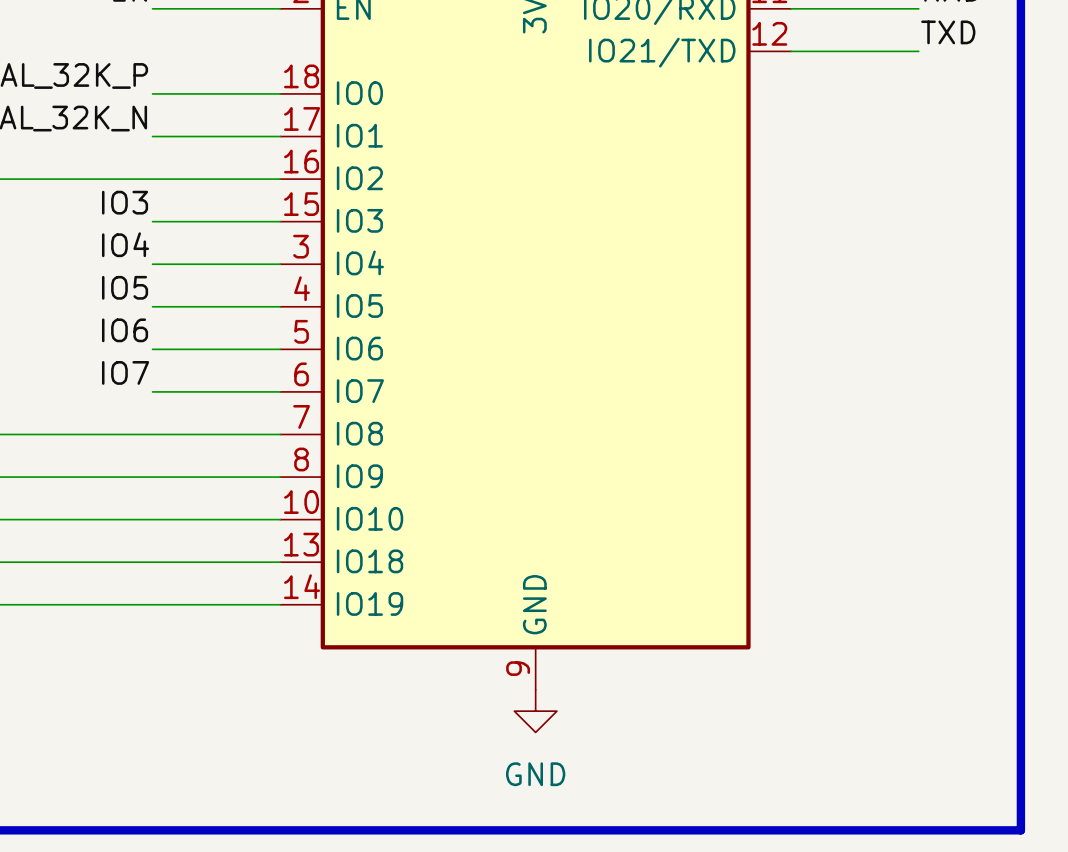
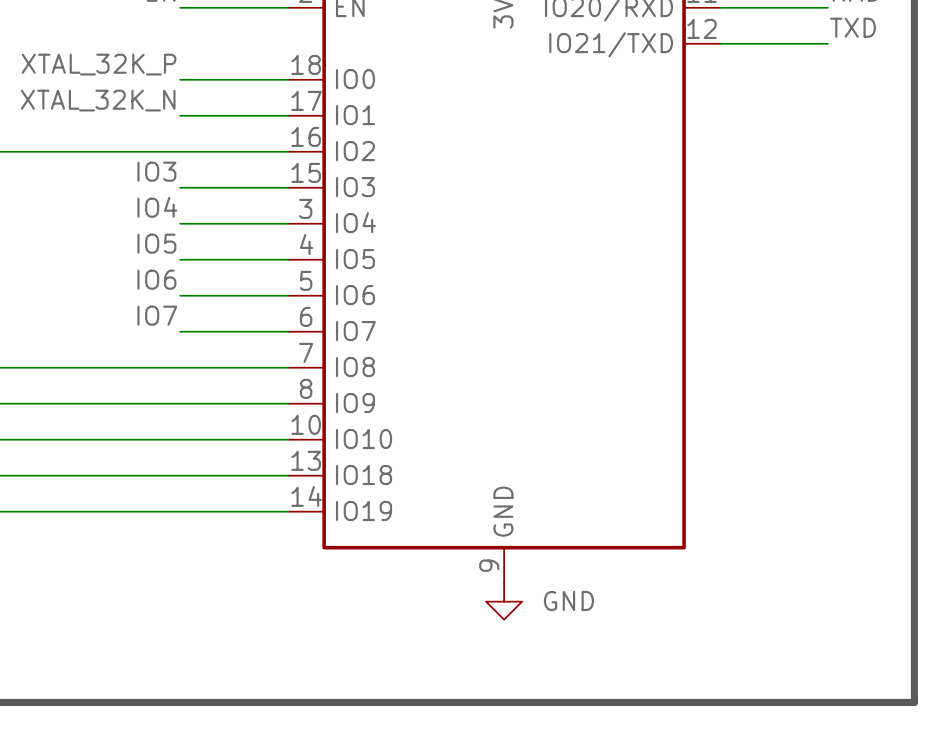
power symbol text position: GND (535, 774) -> GND (568, 600)

